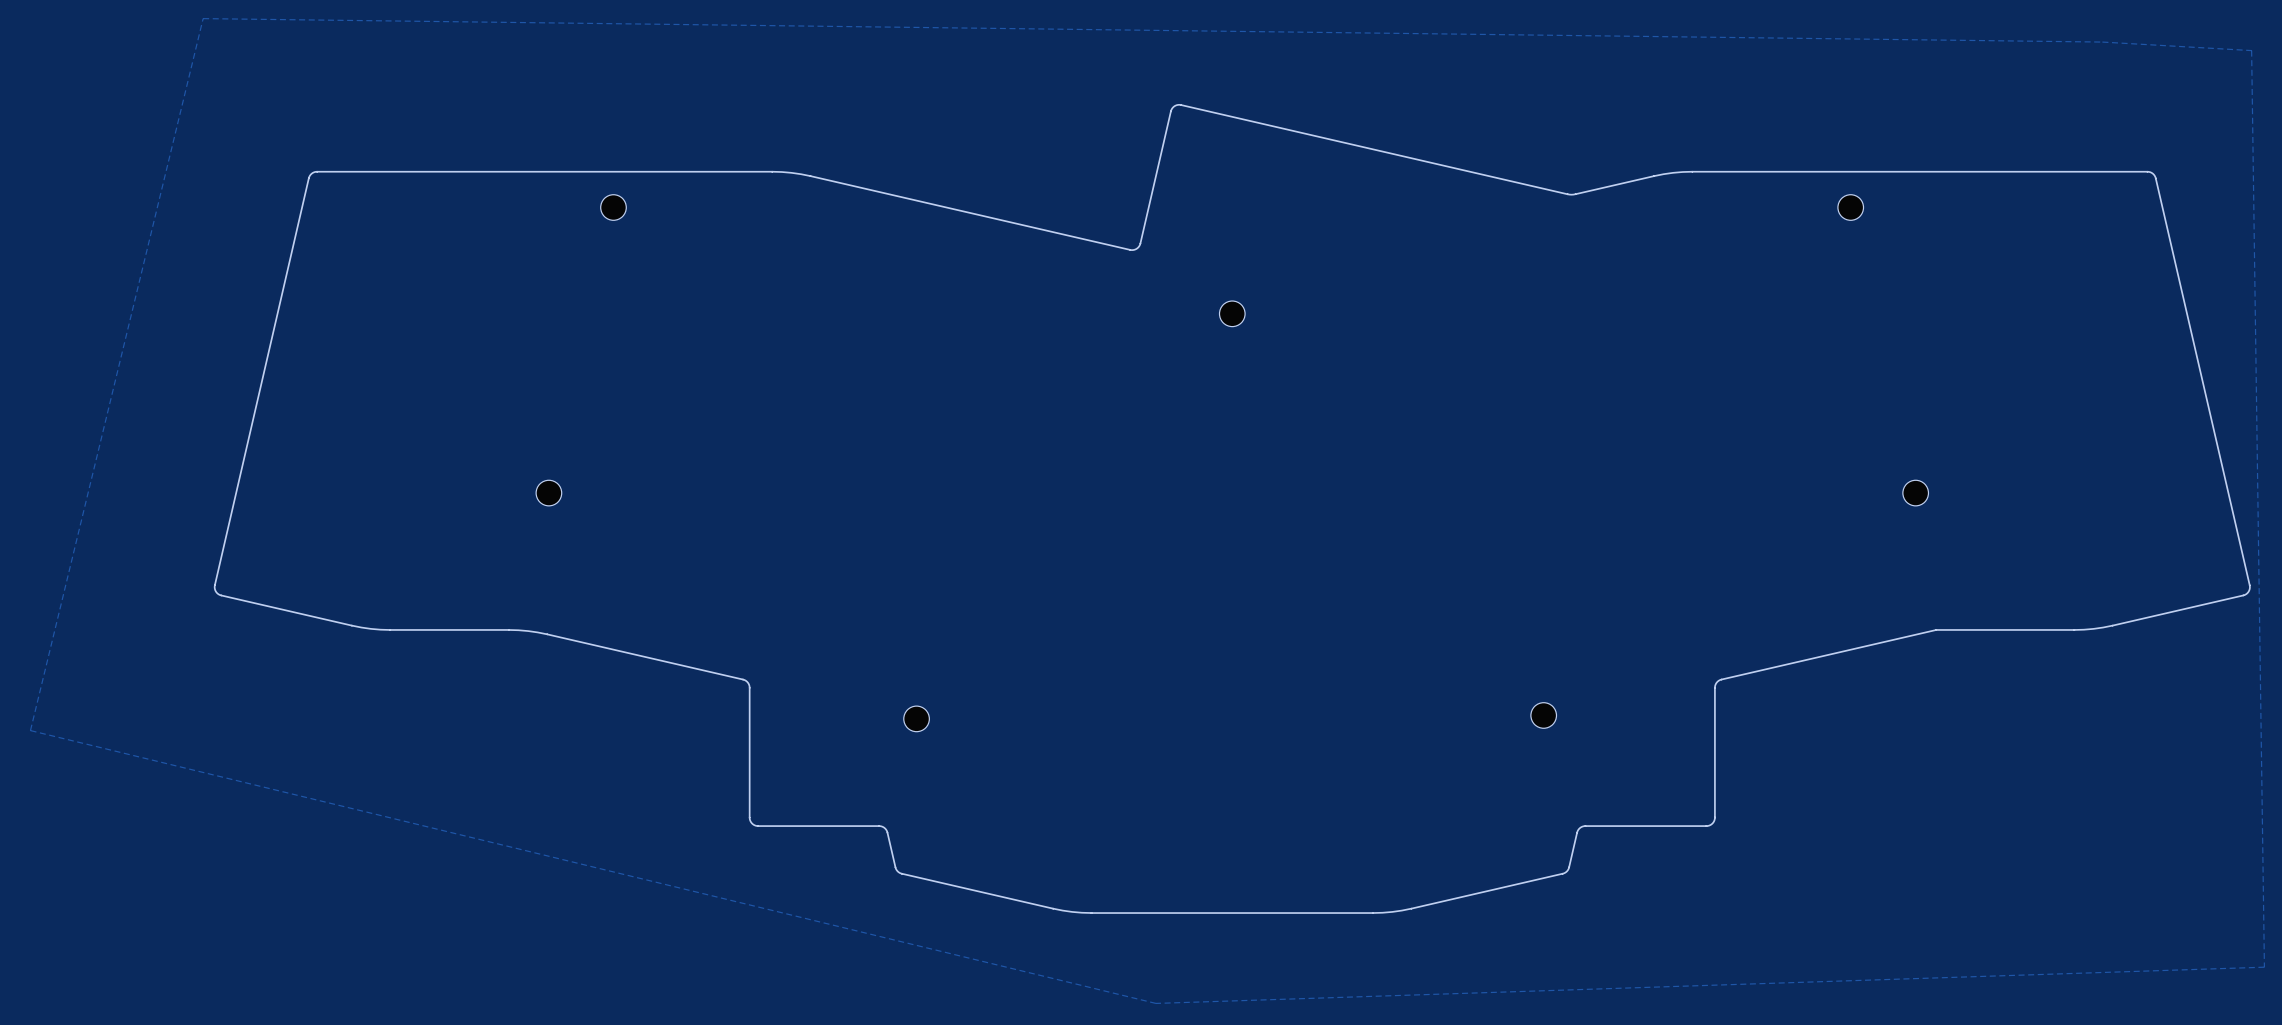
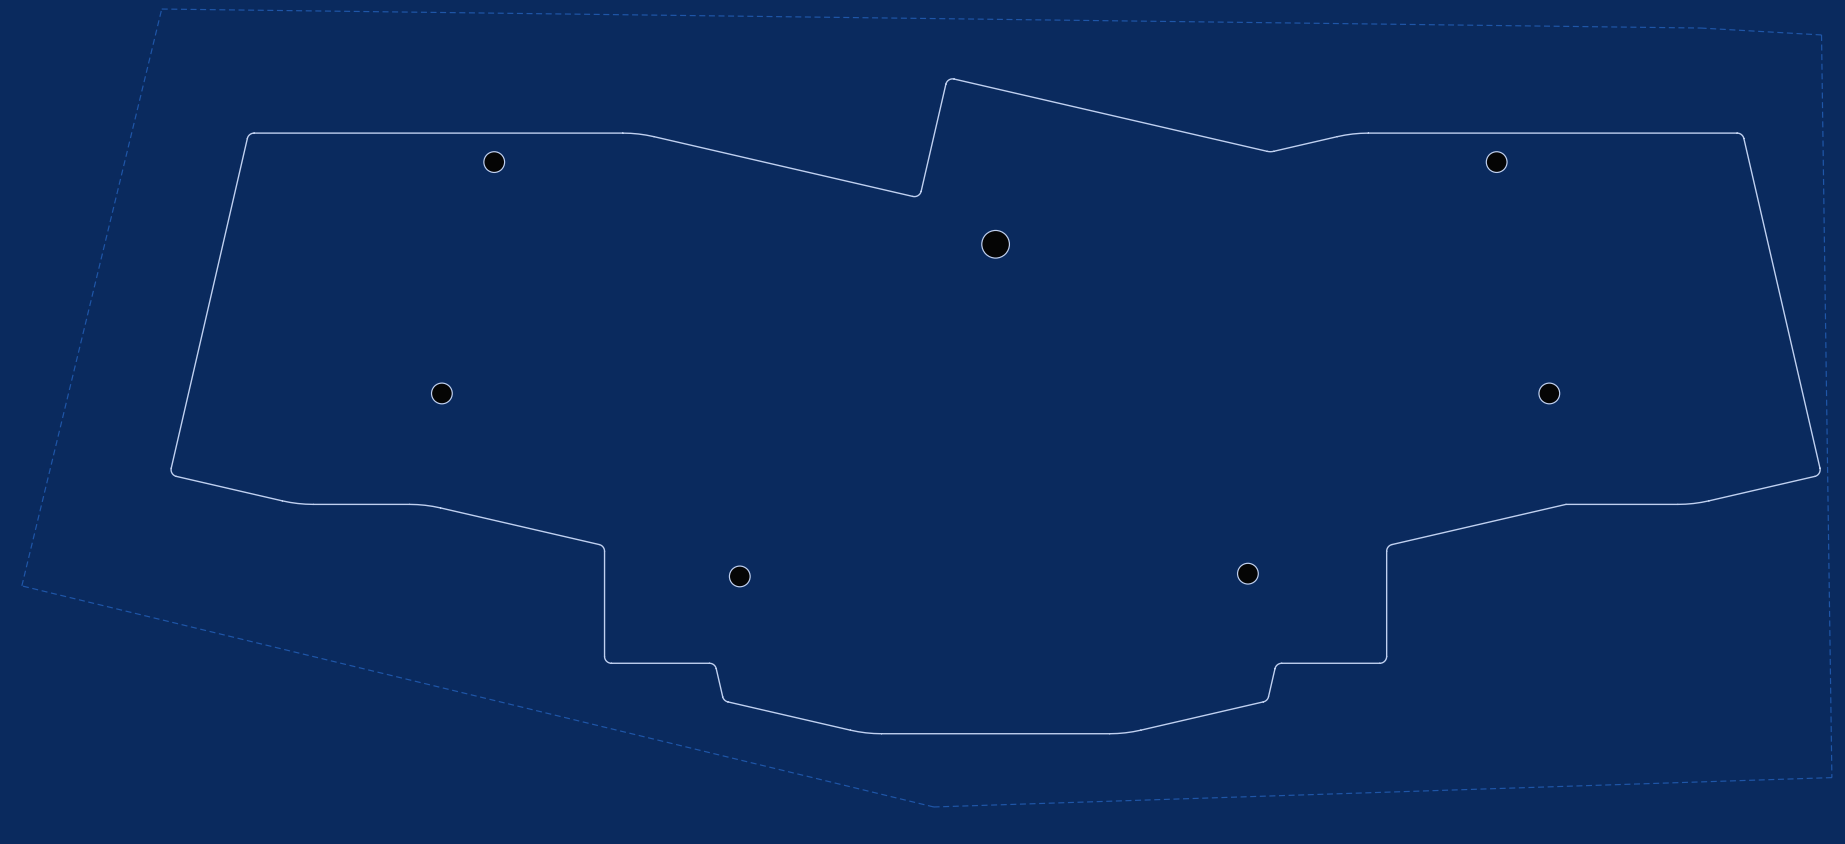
part footprint: [1219, 301, 1246, 327] -> [981, 230, 1010, 259]

